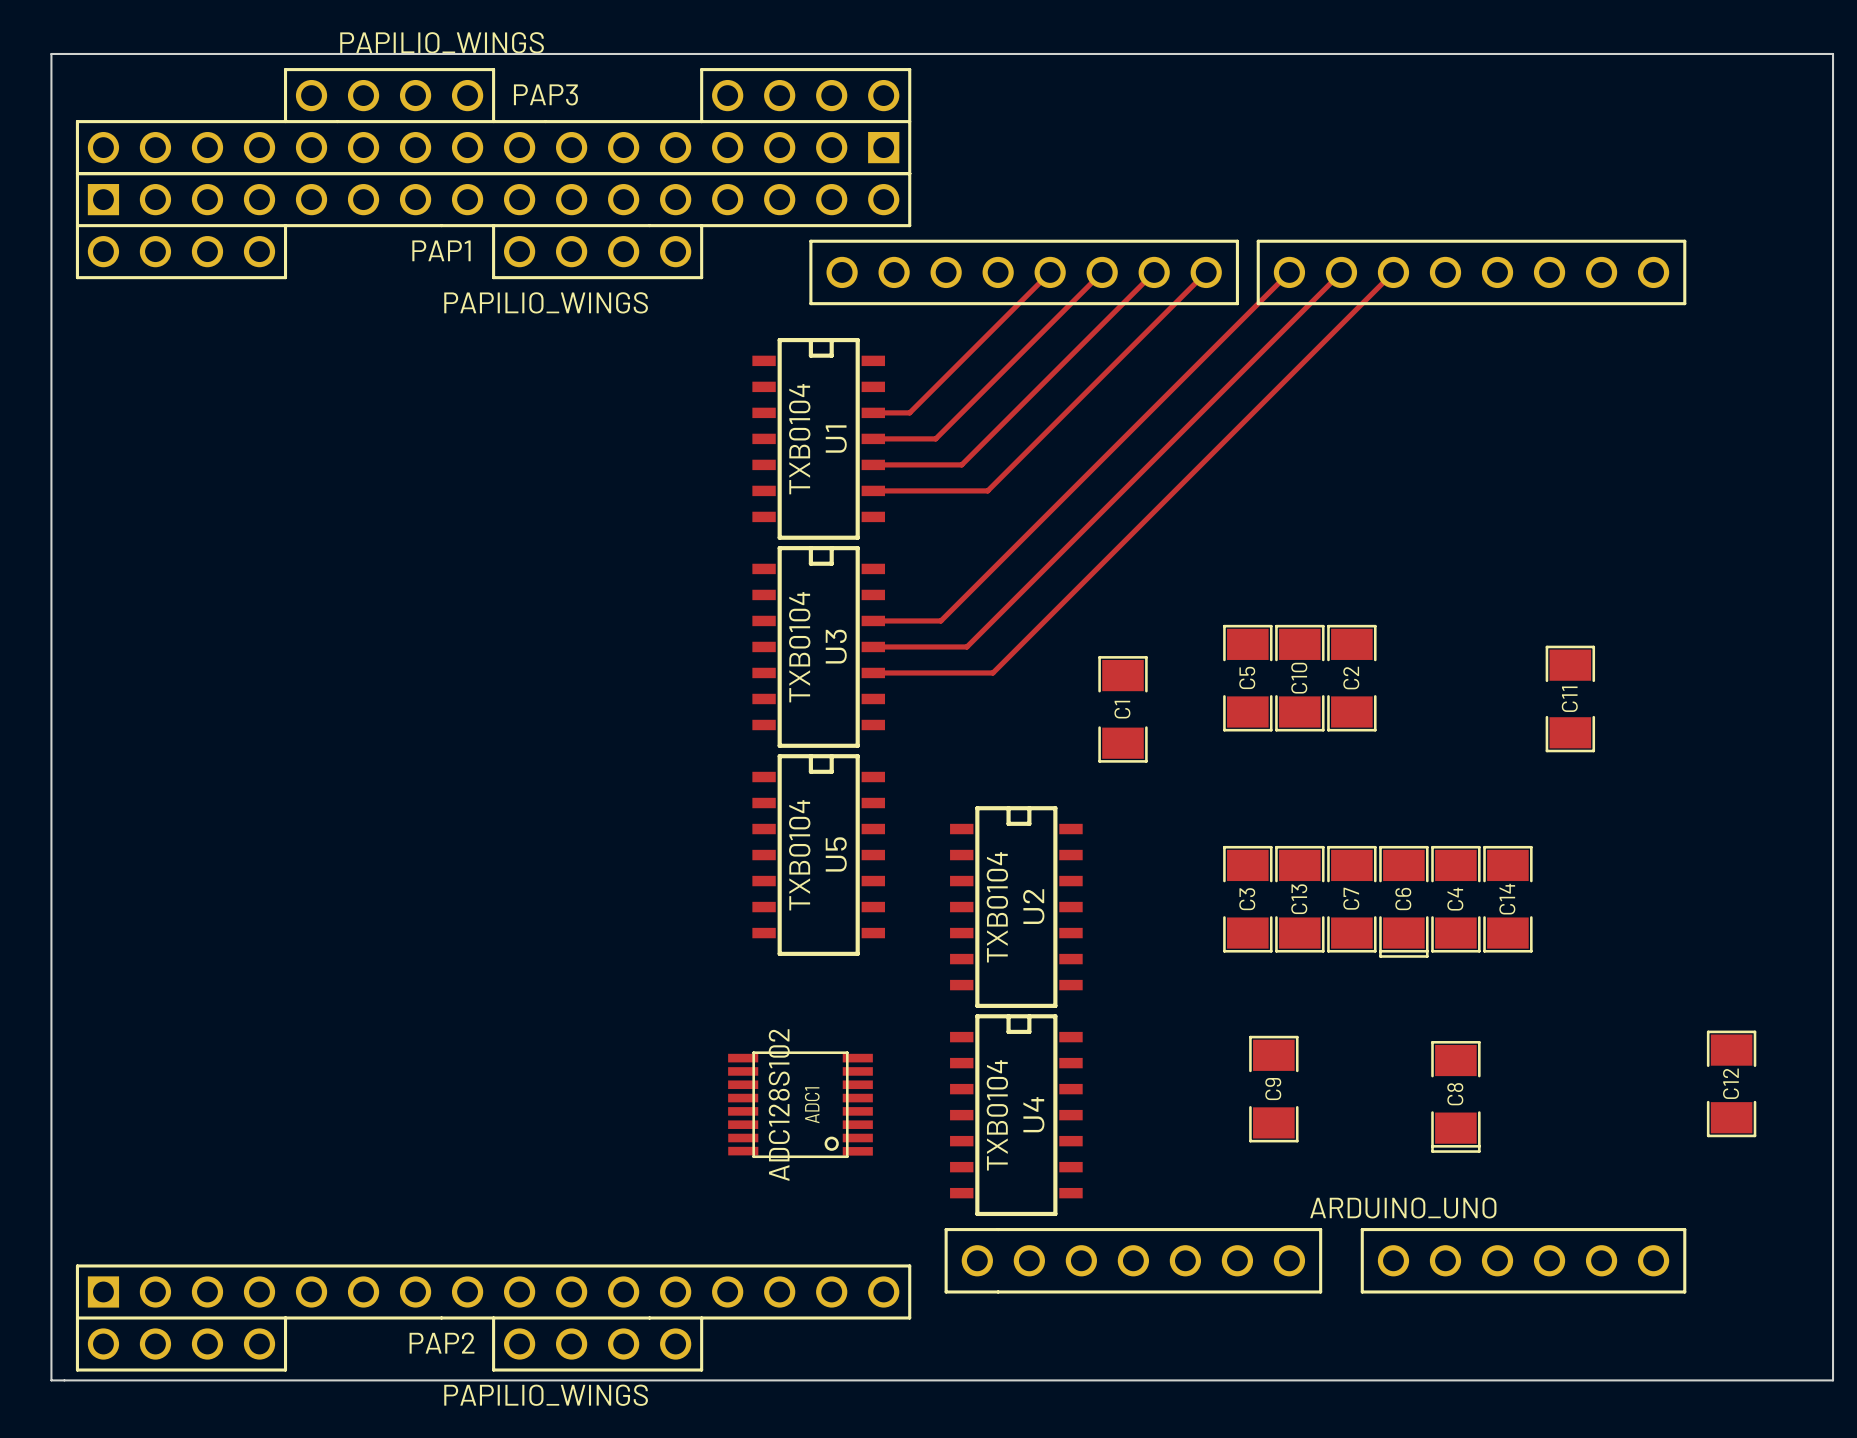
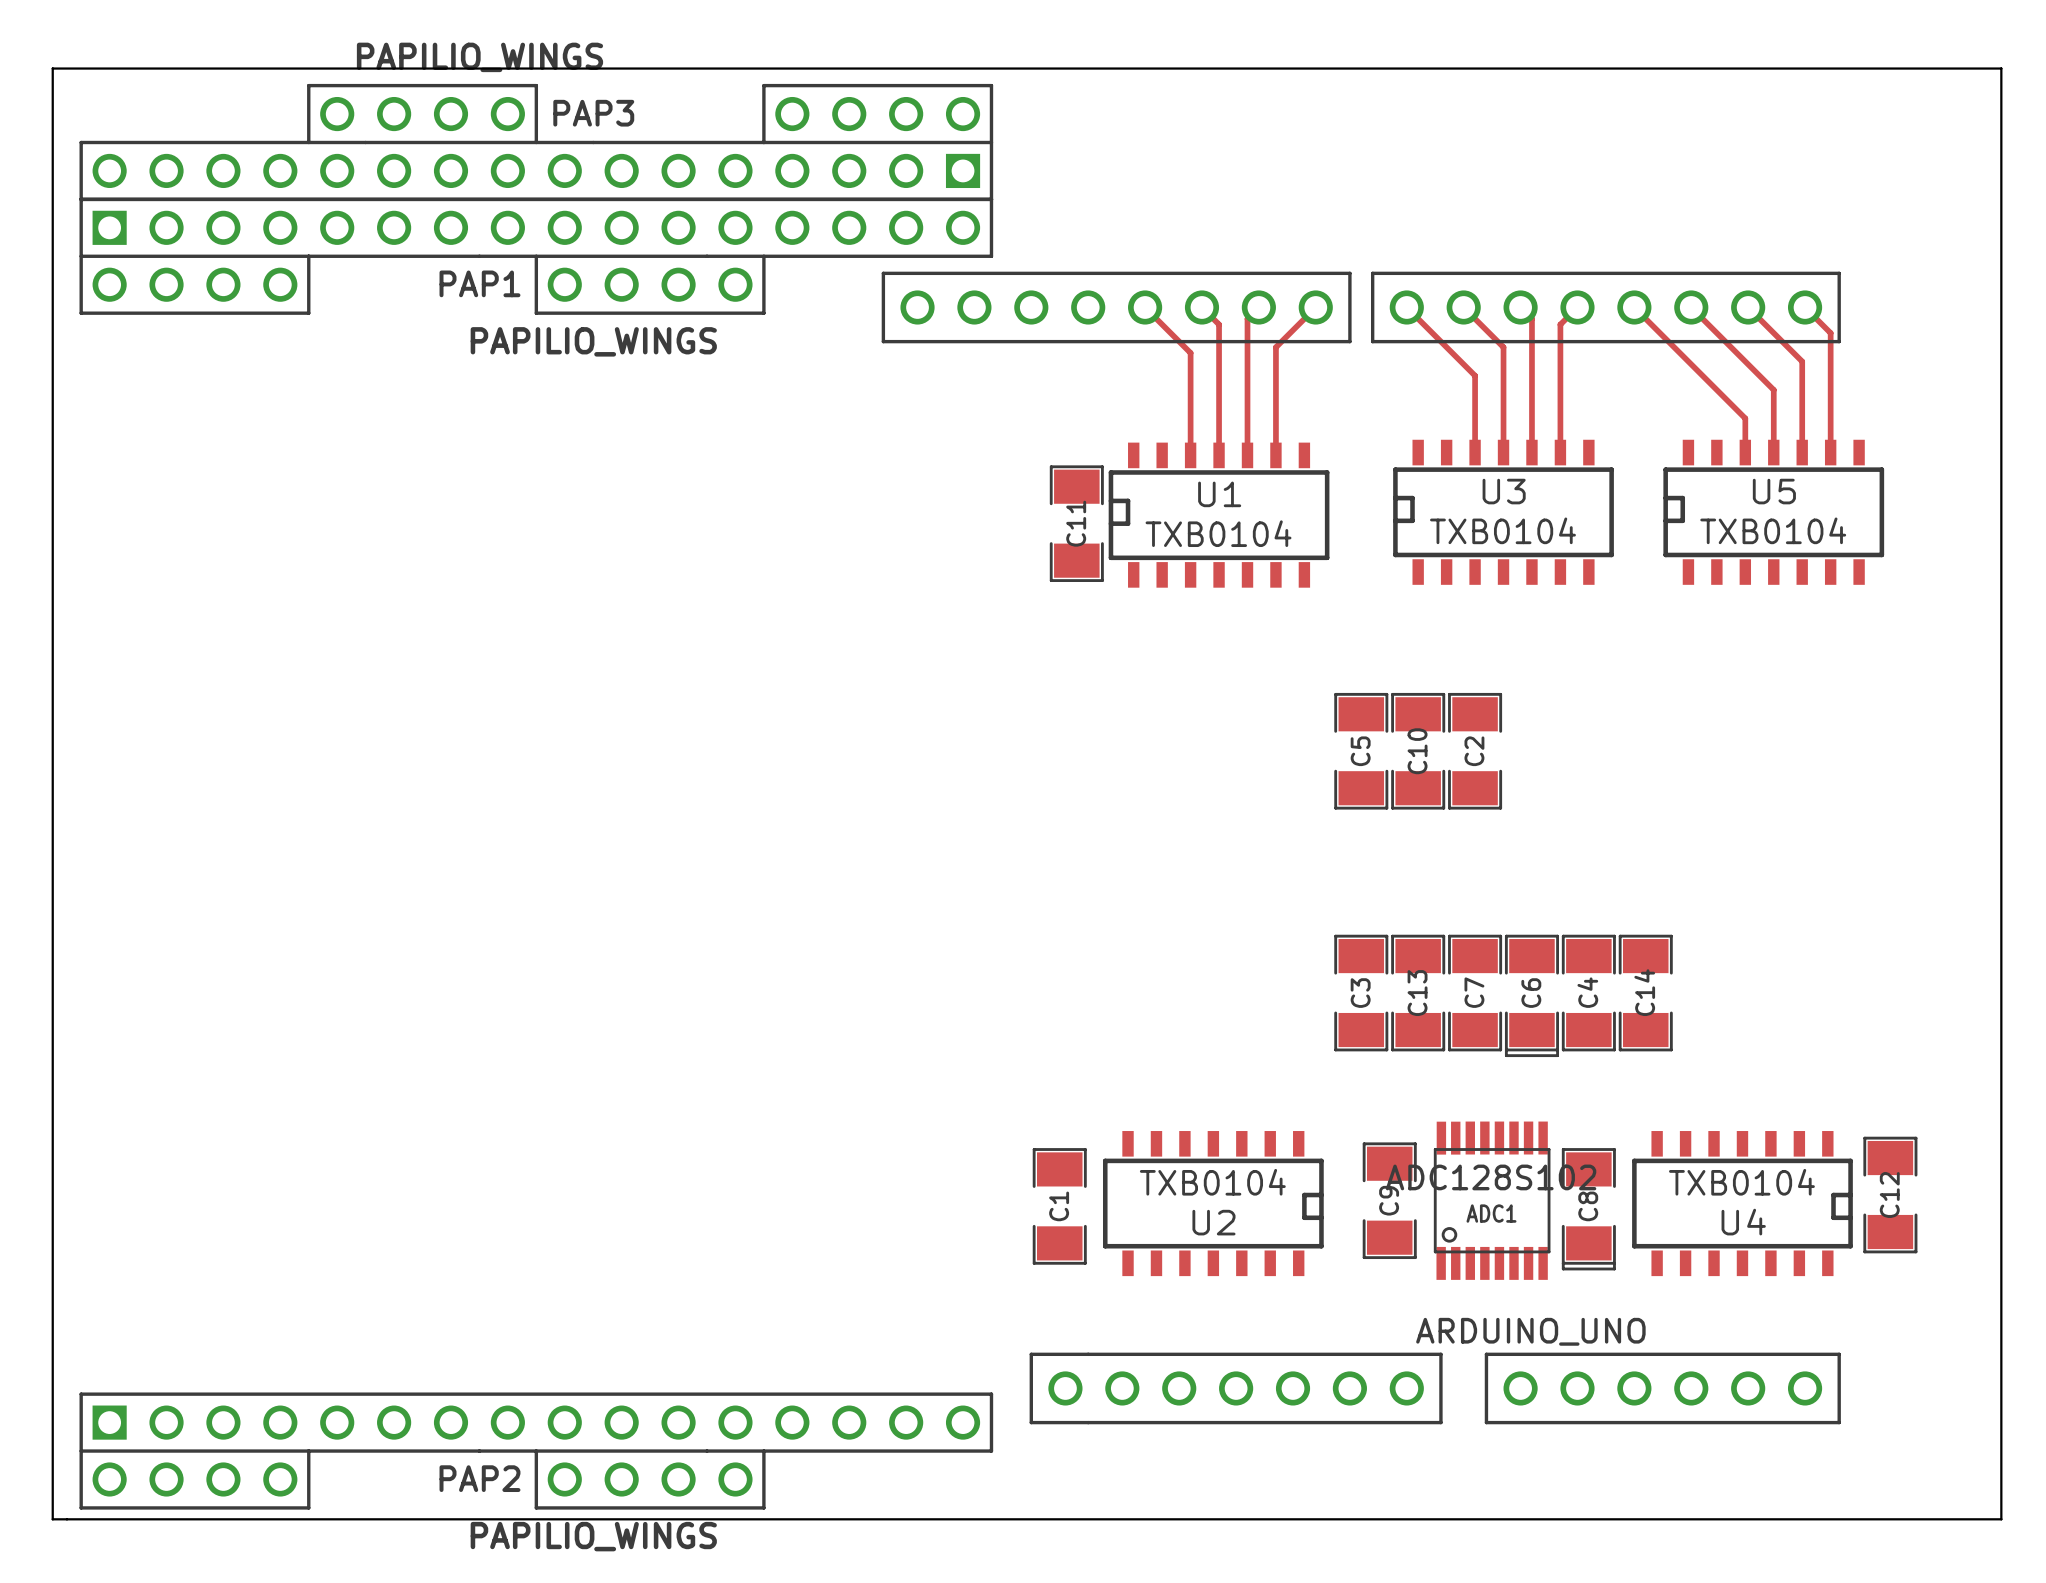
top track: (1050, 272) (909, 412) (873, 412) -> (1145, 307) (1190, 353) (1190, 455)
top track: (1102, 272) (935, 438) (873, 438) -> (1201, 307) (1219, 324) (1219, 455)
top track: (1289, 272) (940, 620) (873, 620) -> (1406, 307) (1475, 375) (1475, 452)
top track: (1341, 272) (966, 646) (873, 646) -> (1463, 307) (1503, 347) (1503, 452)
top track: (1393, 272) (992, 672) (873, 672) -> (1520, 307) (1531, 318) (1531, 452)
top track: none -> (1577, 307) (1560, 324) (1560, 452)
top track: none -> (1634, 307) (1745, 418) (1745, 452)
top track: none -> (1691, 307) (1773, 389) (1773, 452)
top track: none -> (1748, 307) (1802, 361) (1802, 452)
top track: none -> (1805, 307) (1830, 333) (1830, 452)
top track: (1143, 282) (961, 464) (873, 464) -> (1247, 318) (1247, 455)
top track: (1169, 308) (987, 490) (873, 490) -> (1275, 347) (1275, 455)
U1 rotation: 0° (818, 438) -> 90° counterclockwise (1219, 515)
U1 position: (818, 438) -> (1219, 515)
U3 rotation: 0° (818, 646) -> 90° counterclockwise (1503, 512)
U3 position: (818, 646) -> (1503, 512)
C11 position: (1570, 698) -> (1076, 523)
C1 position: (1122, 709) -> (1059, 1206)
U5 rotation: 0° (818, 855) -> 90° counterclockwise (1773, 512)
U5 position: (818, 855) -> (1773, 512)
U2 rotation: 0° (1016, 907) -> 90° clockwise (1213, 1203)
U2 position: (1016, 907) -> (1213, 1203)
ADC1 rotation: 0° (800, 1104) -> 90° clockwise (1492, 1200)
ADC1 position: (800, 1104) -> (1492, 1200)
U4 rotation: 0° (1016, 1115) -> 90° clockwise (1742, 1203)
U4 position: (1016, 1115) -> (1742, 1203)

